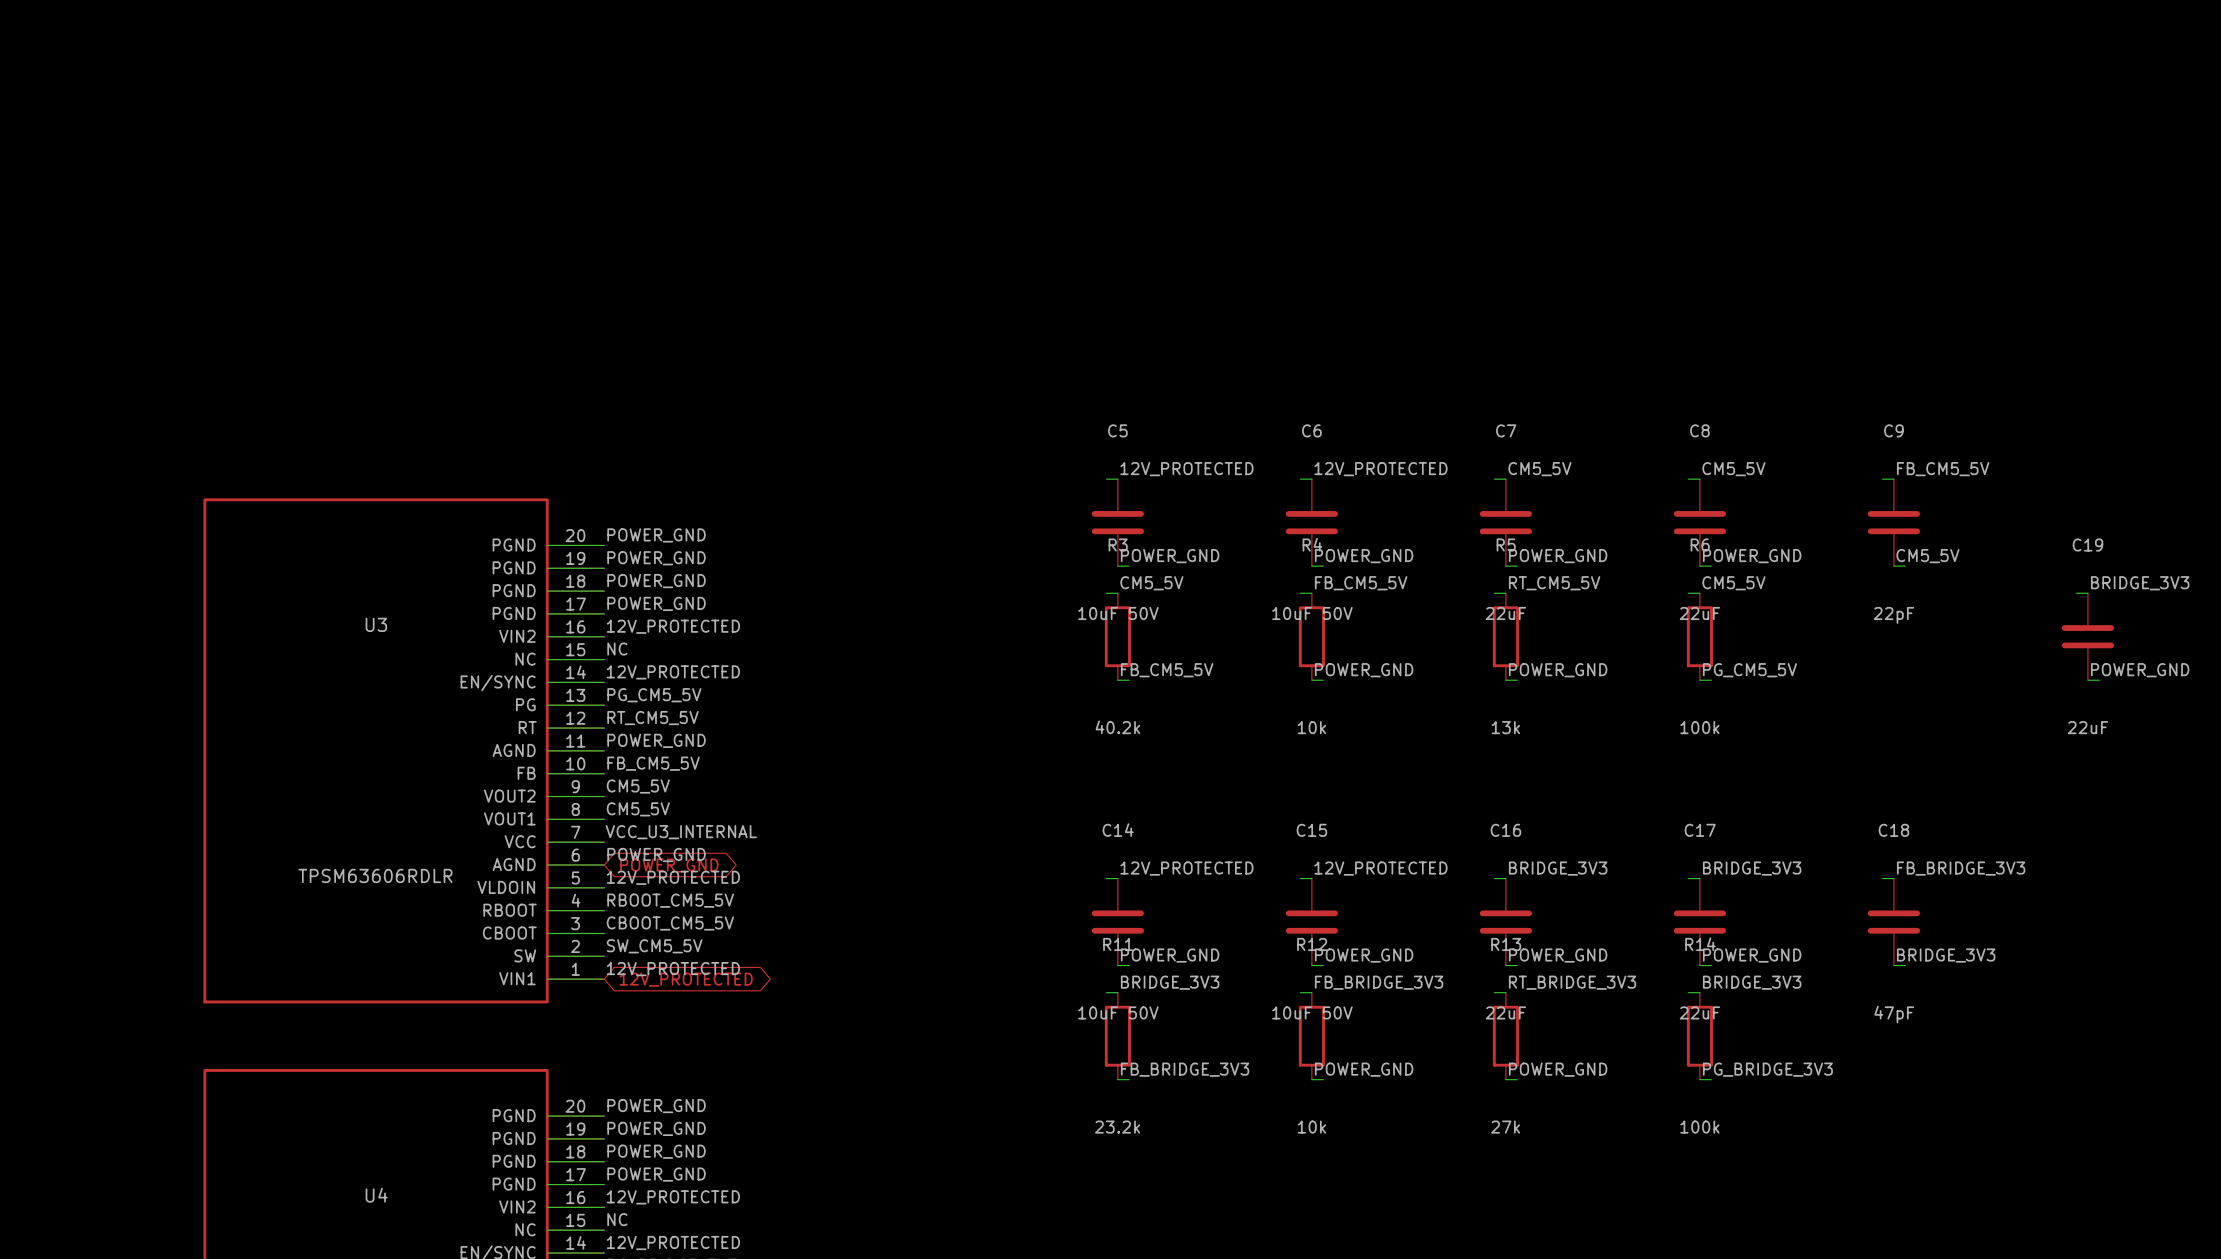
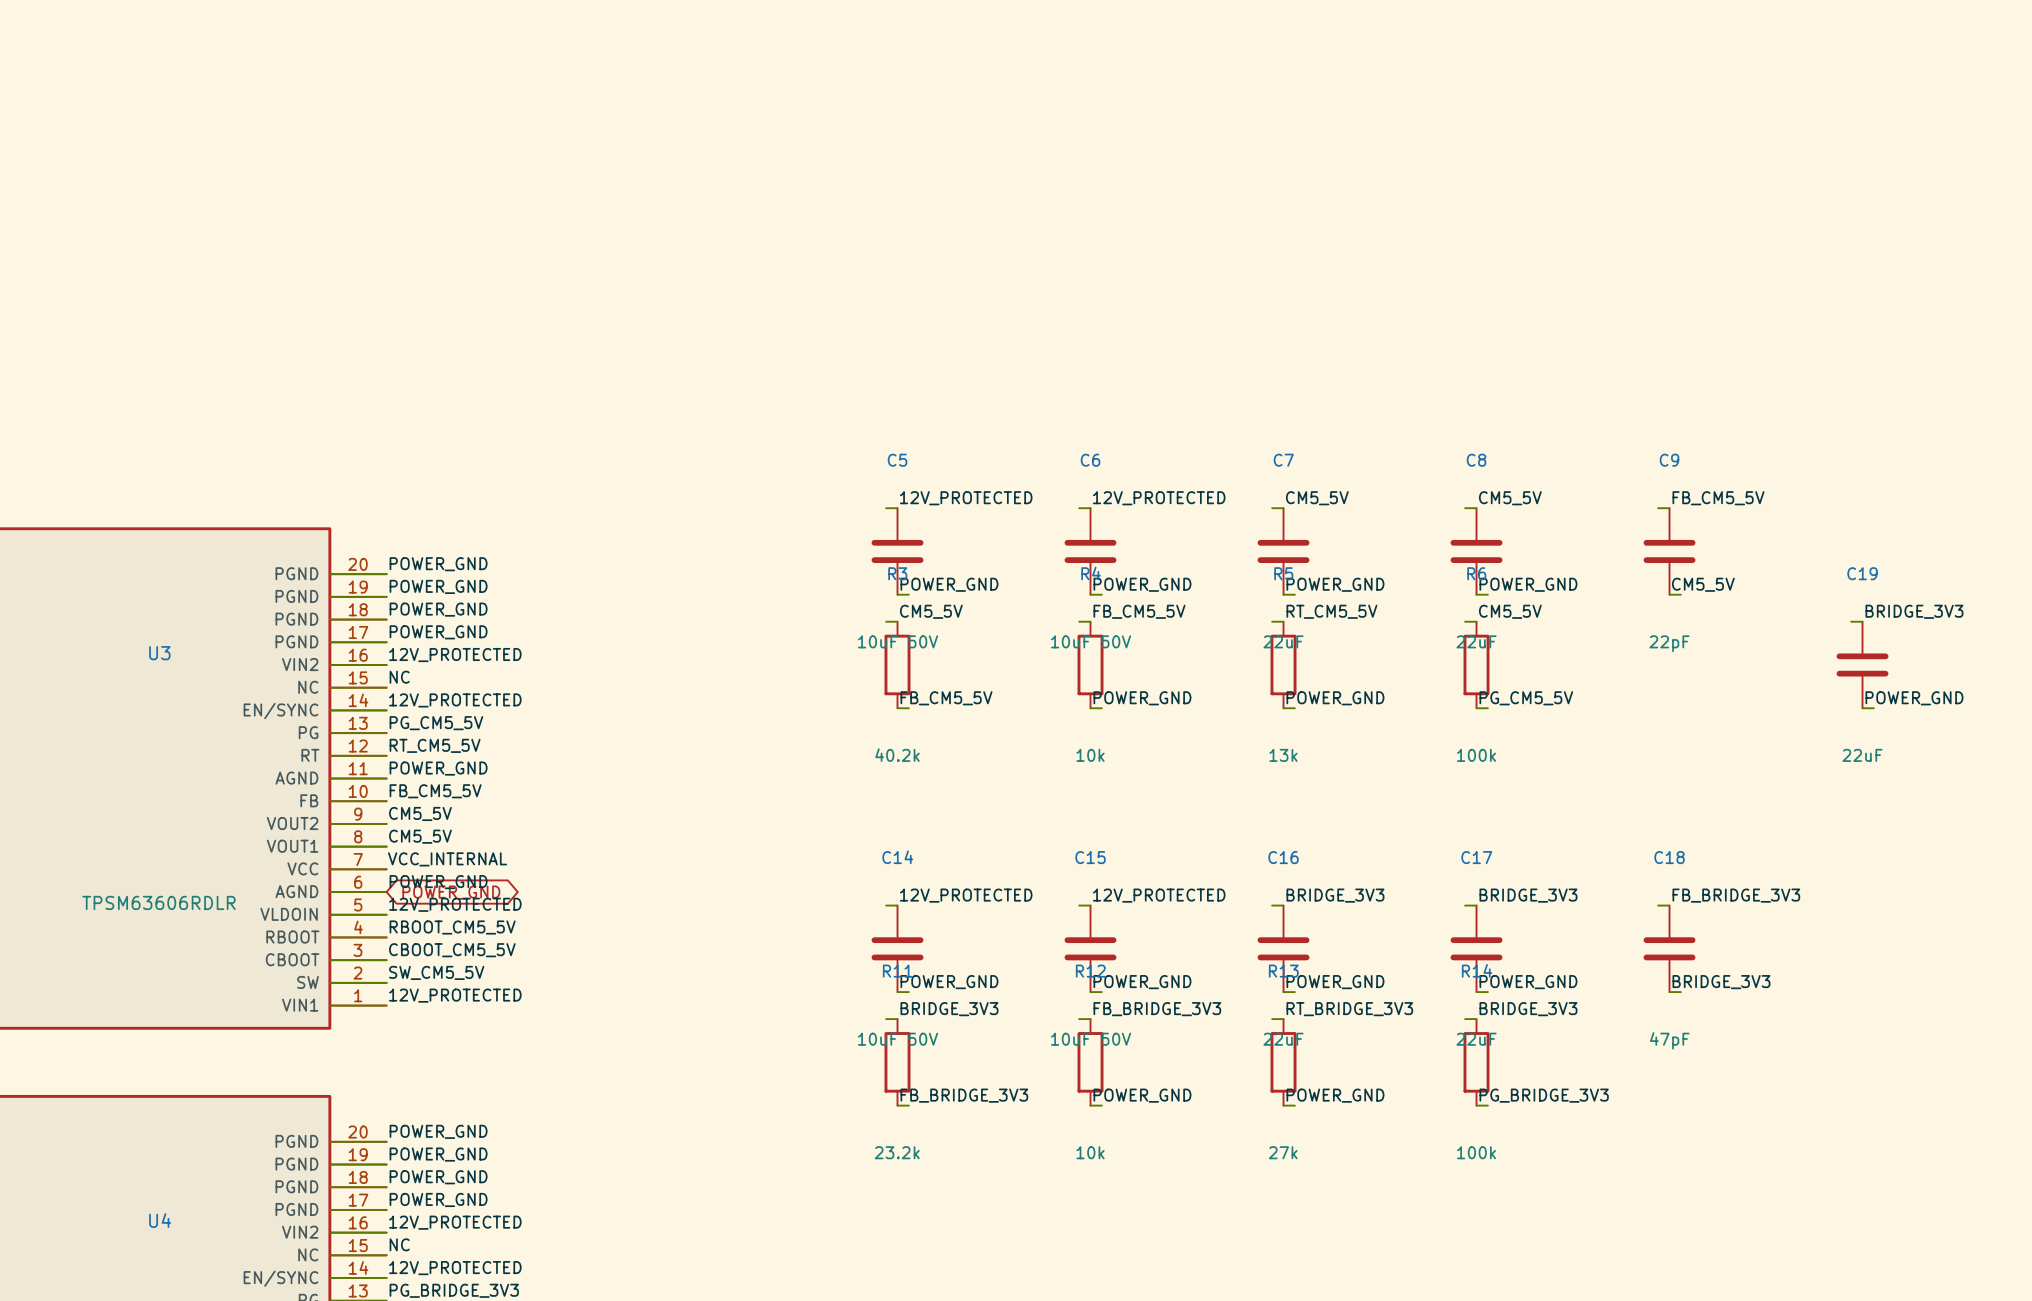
label: VCC_U3_INTERNAL (681, 832) -> VCC_INTERNAL (447, 859)
global label: 12V_PROTECTED (686, 979) -> none

